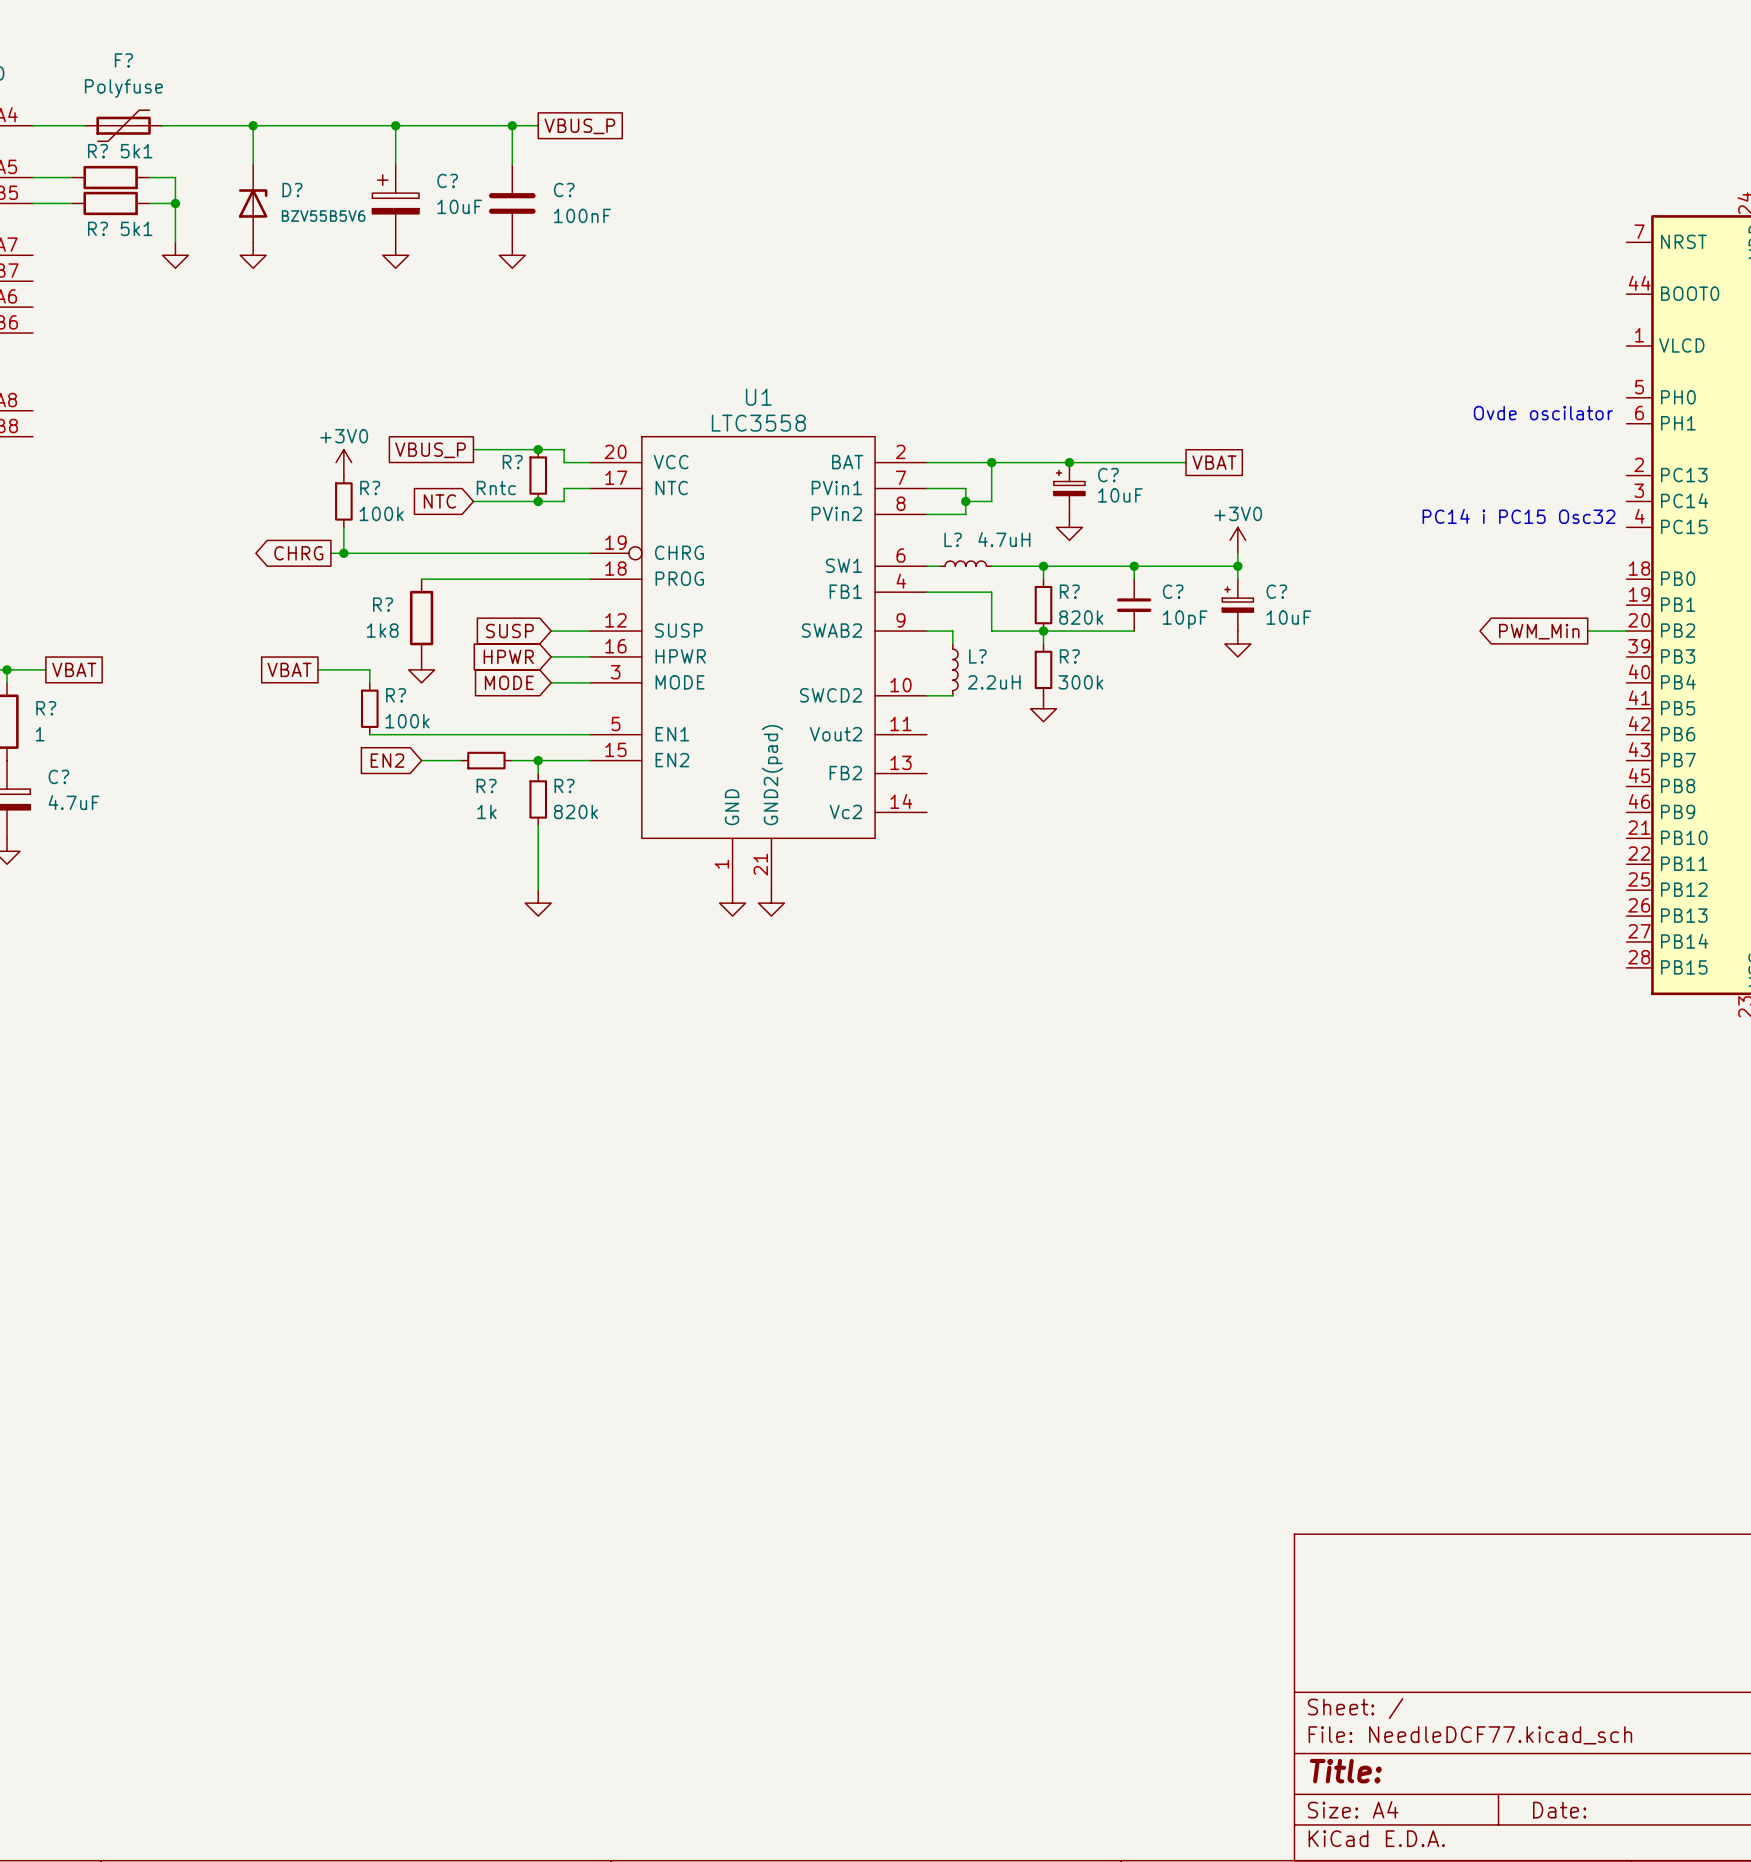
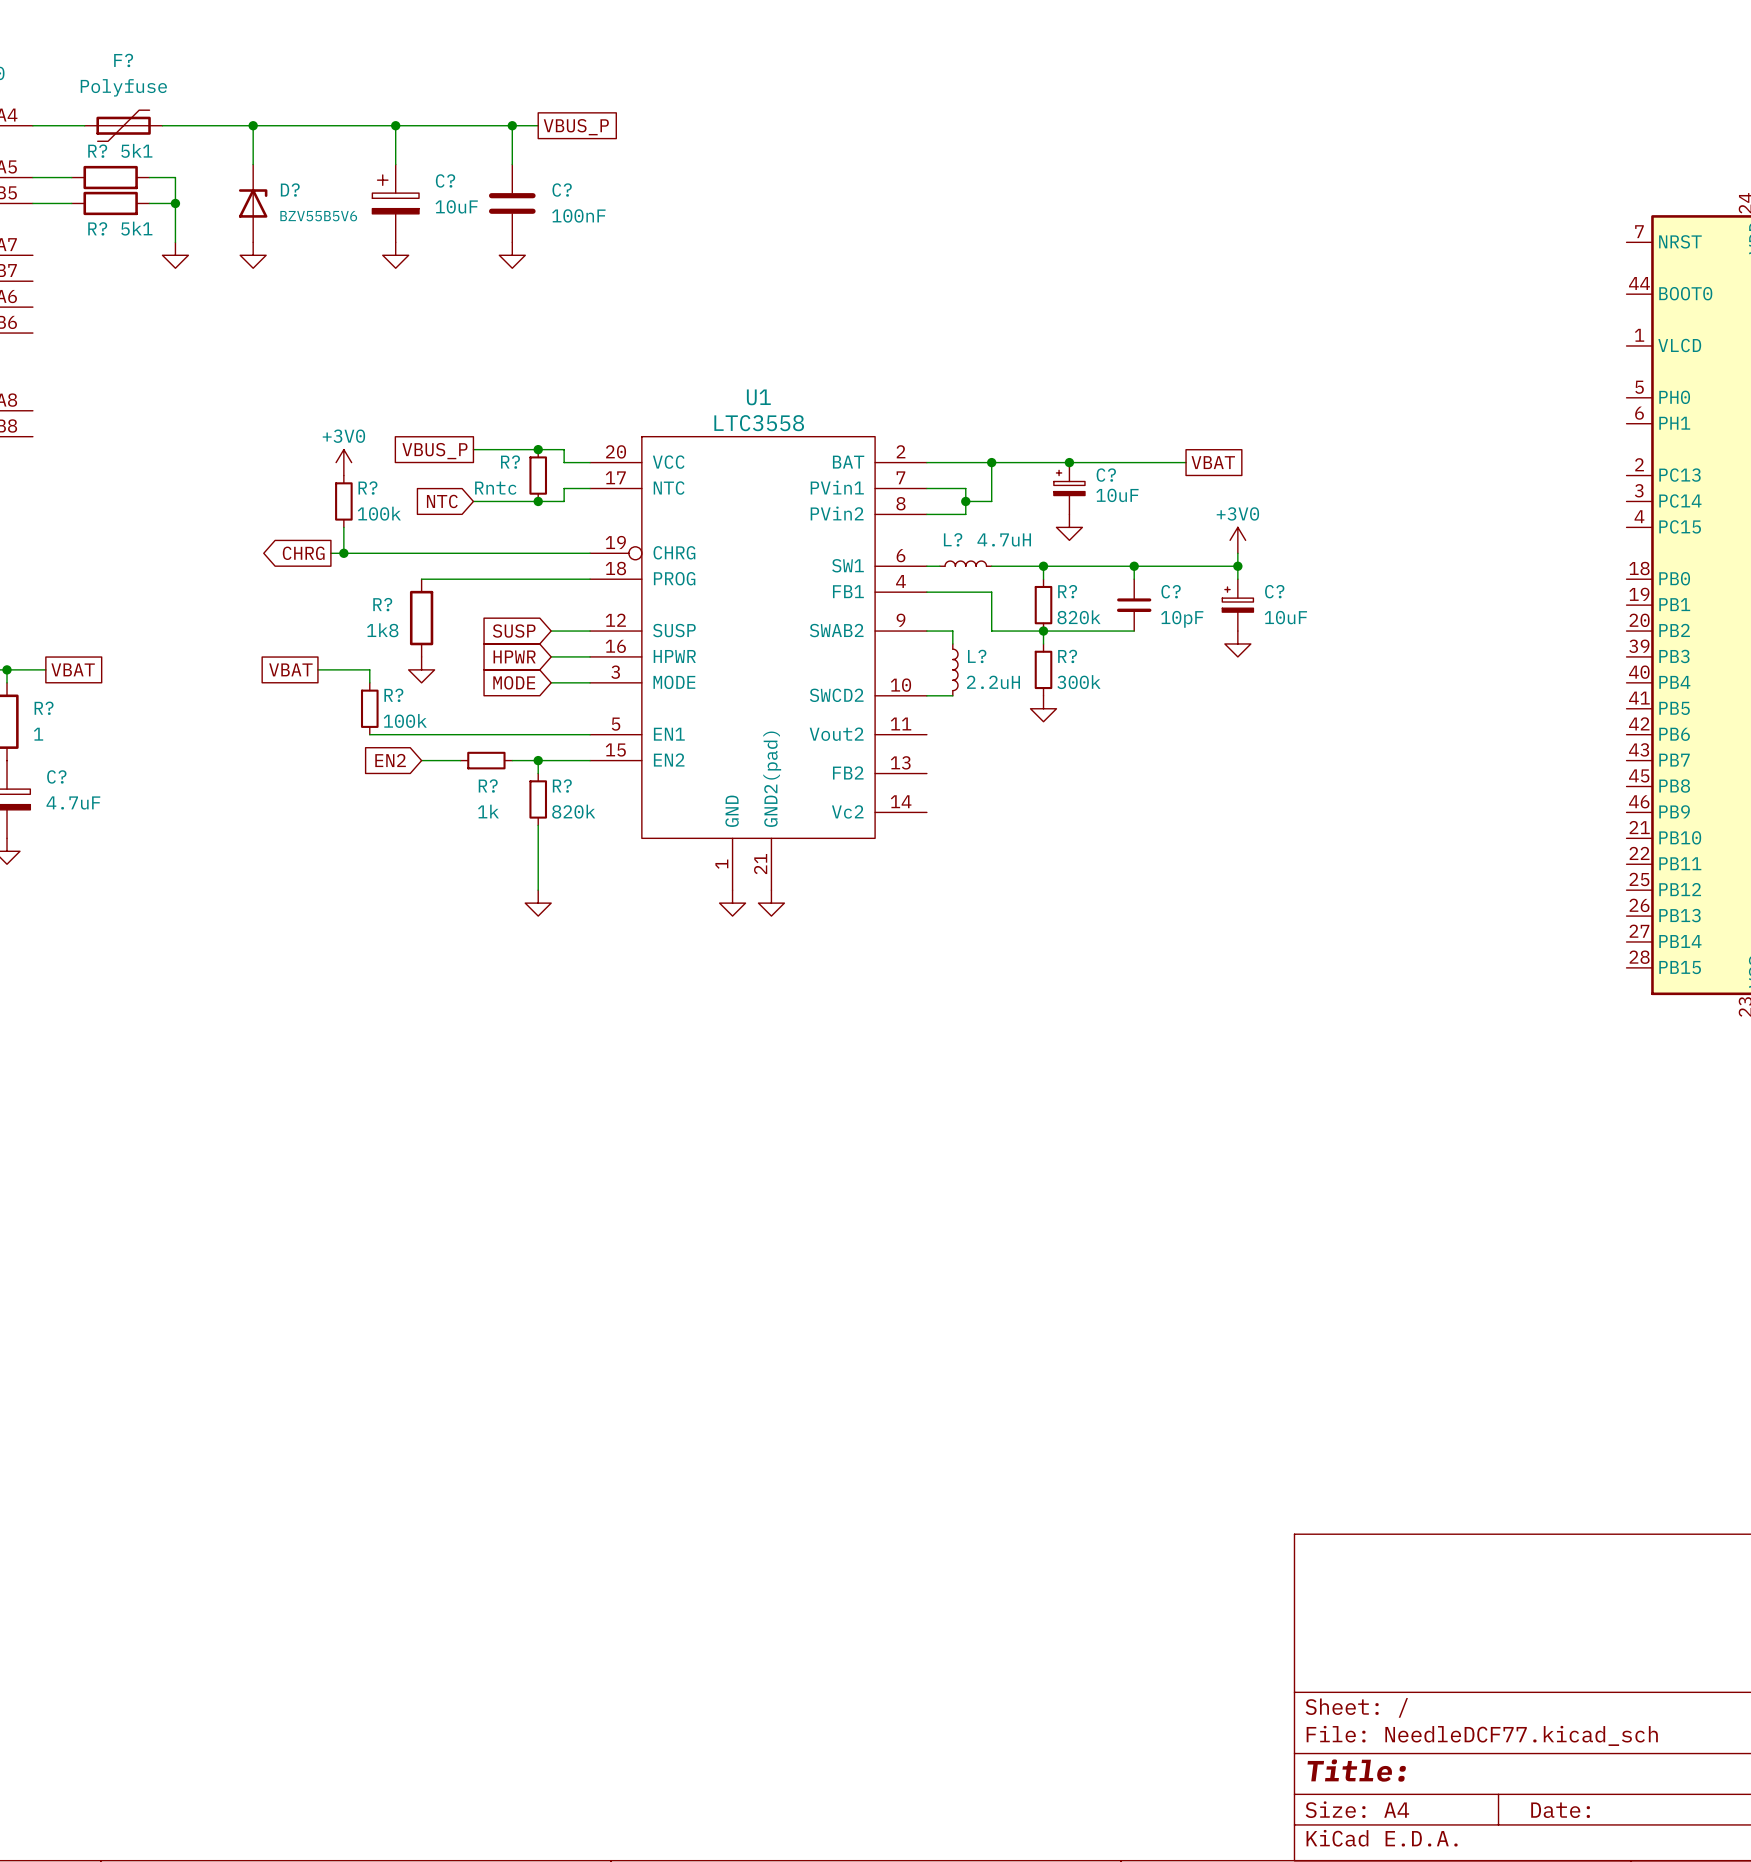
text: Ovde oscilator (1543, 413) -> none
text: PC14 i PC15 Osc32 (1518, 516) -> none
global label: PWM_Min (1539, 631) -> none
wire: (1587, 631) (1626, 631) -> none

